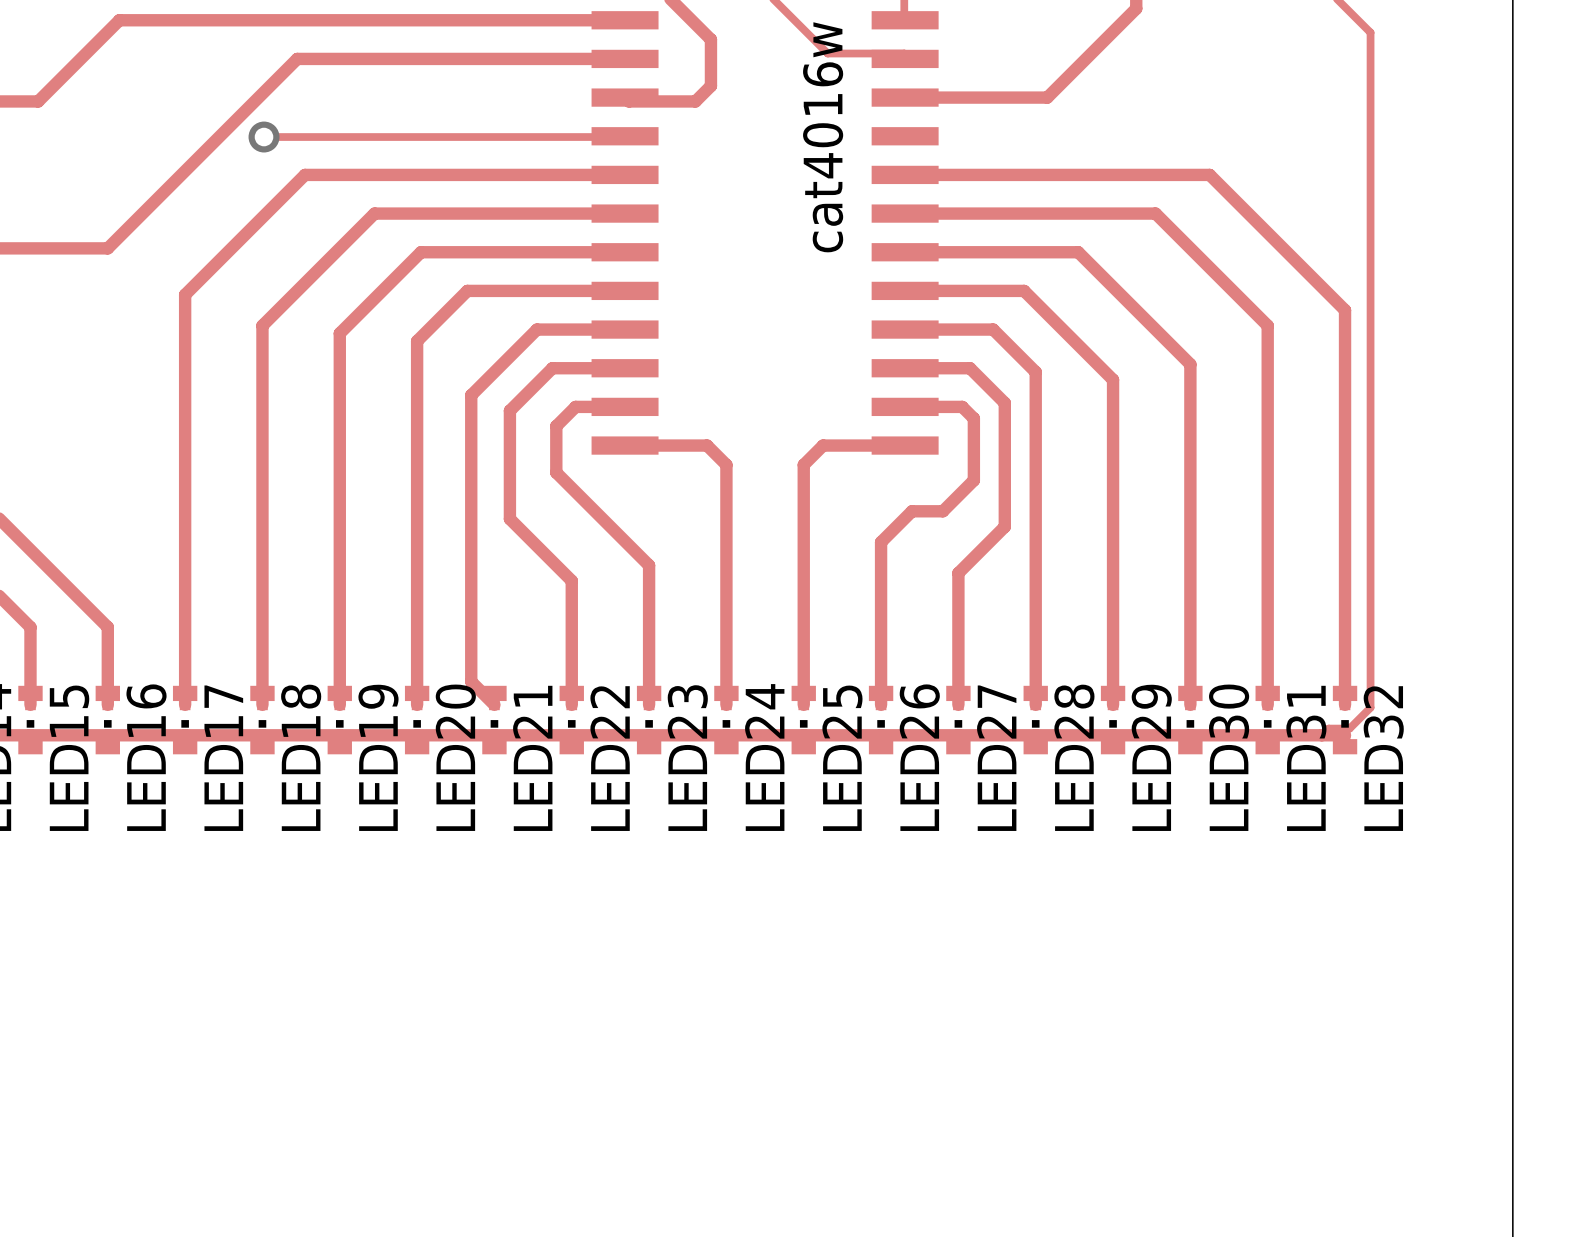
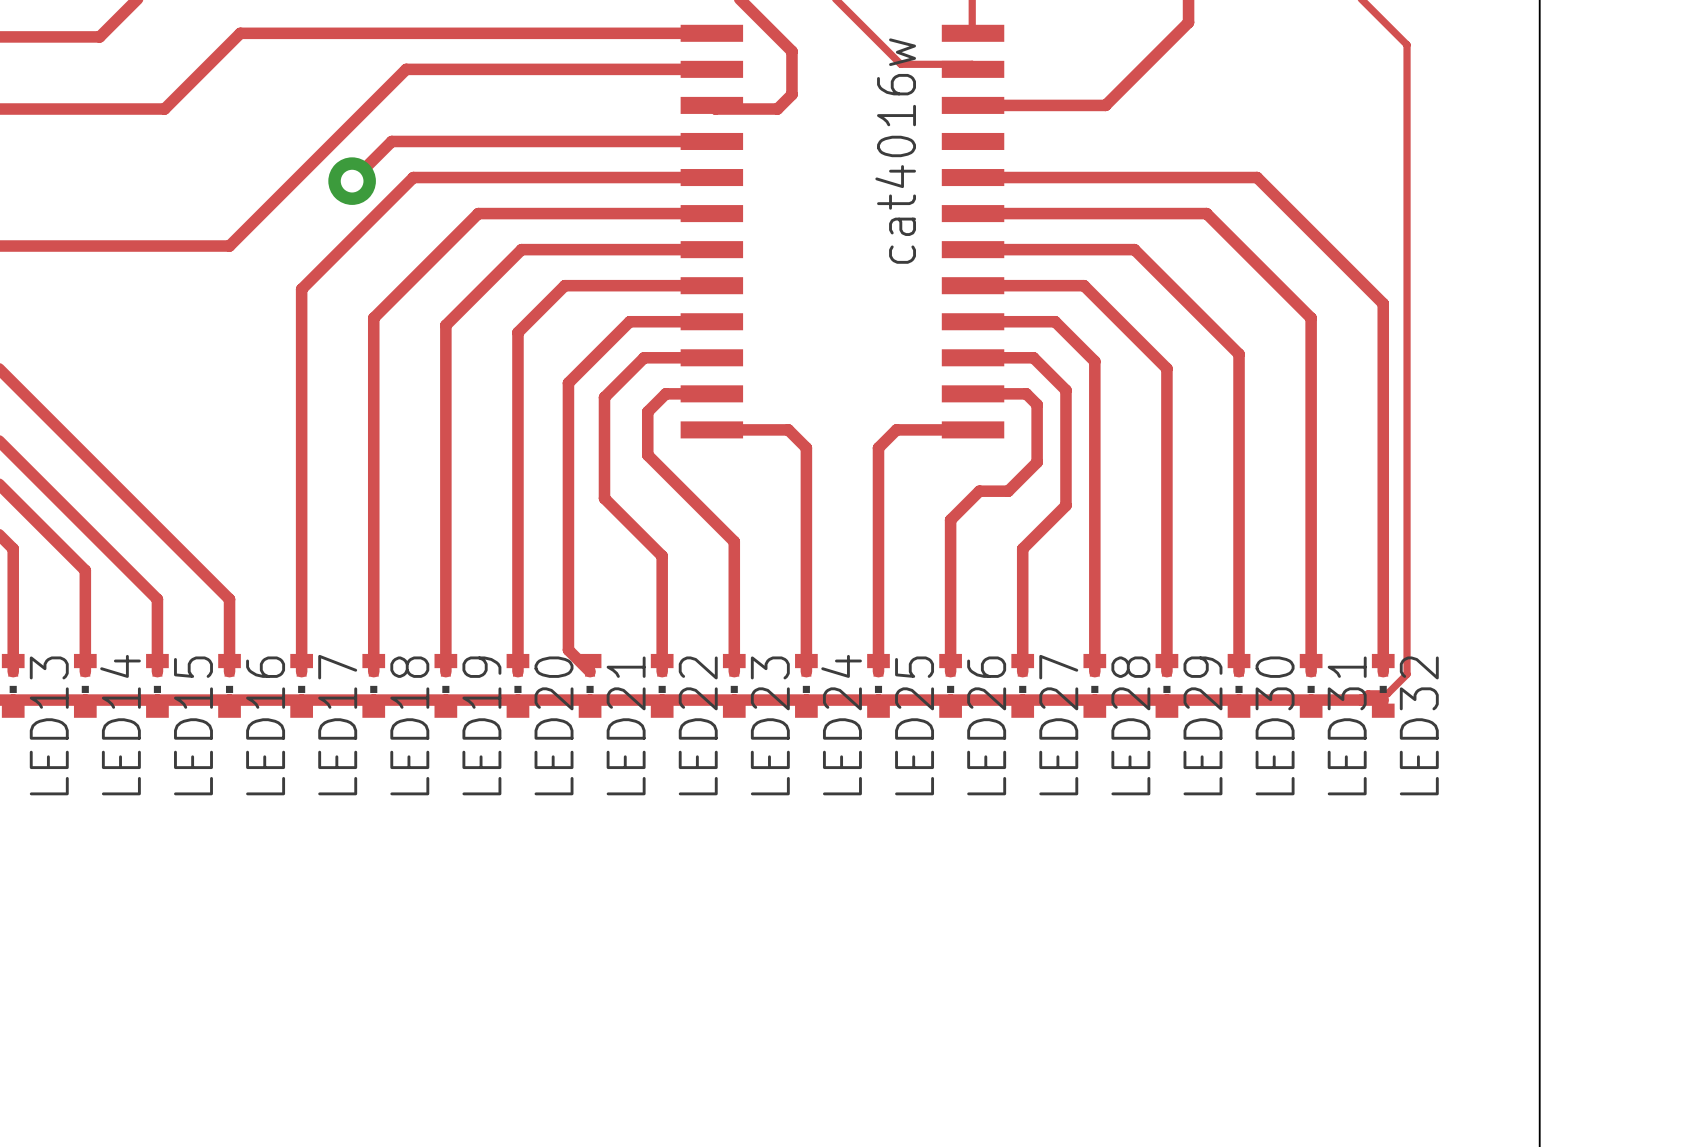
track: (625, 136) (264, 137) -> (711, 141) (391, 141) (352, 181)
via: (264, 137) -> none
via: none -> (352, 181)

